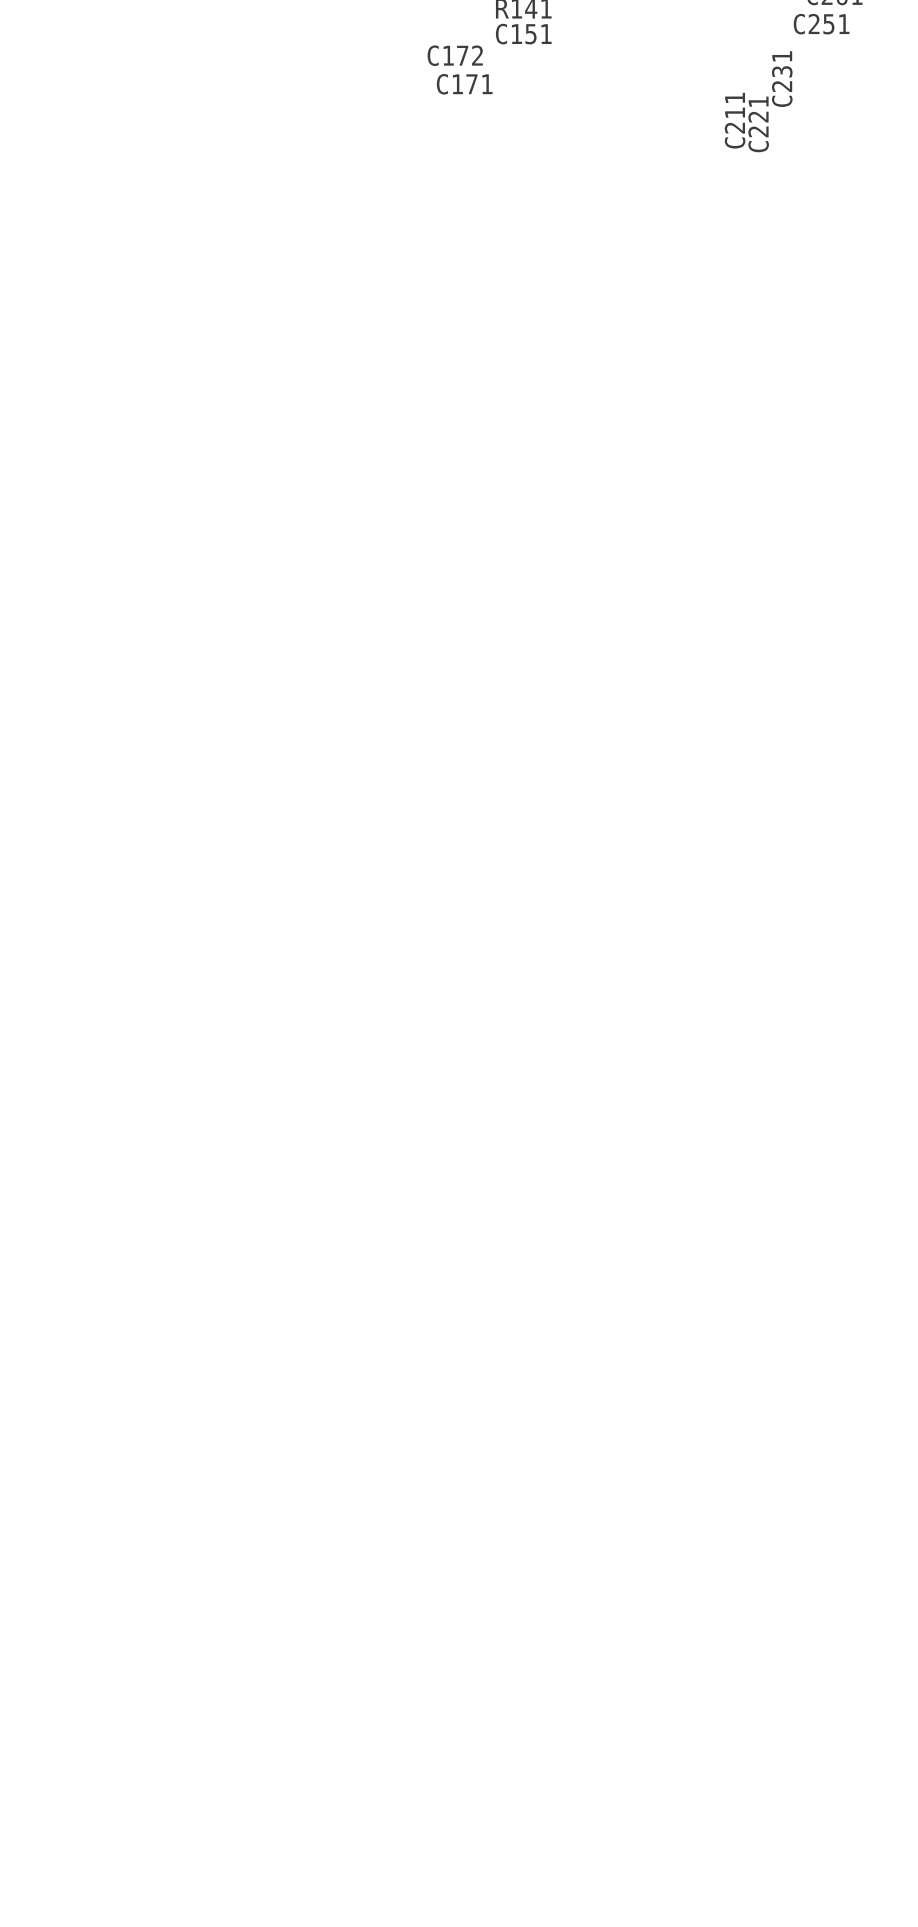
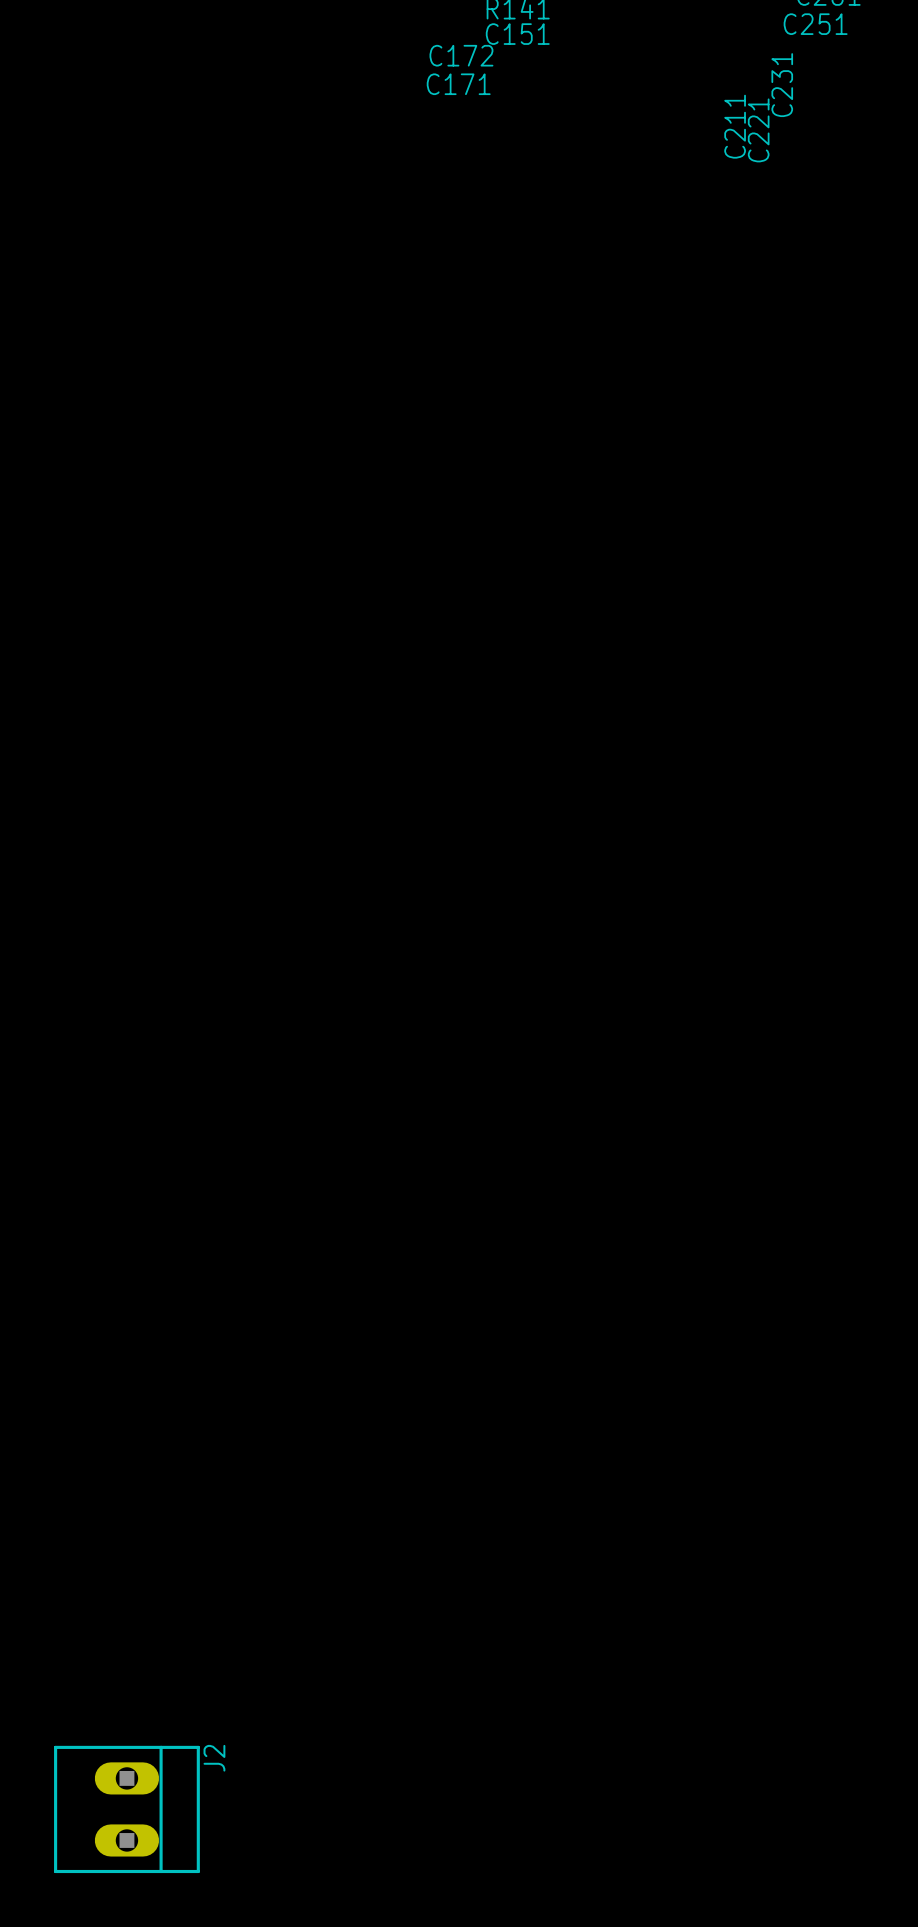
J2: none -> (126, 1809)

